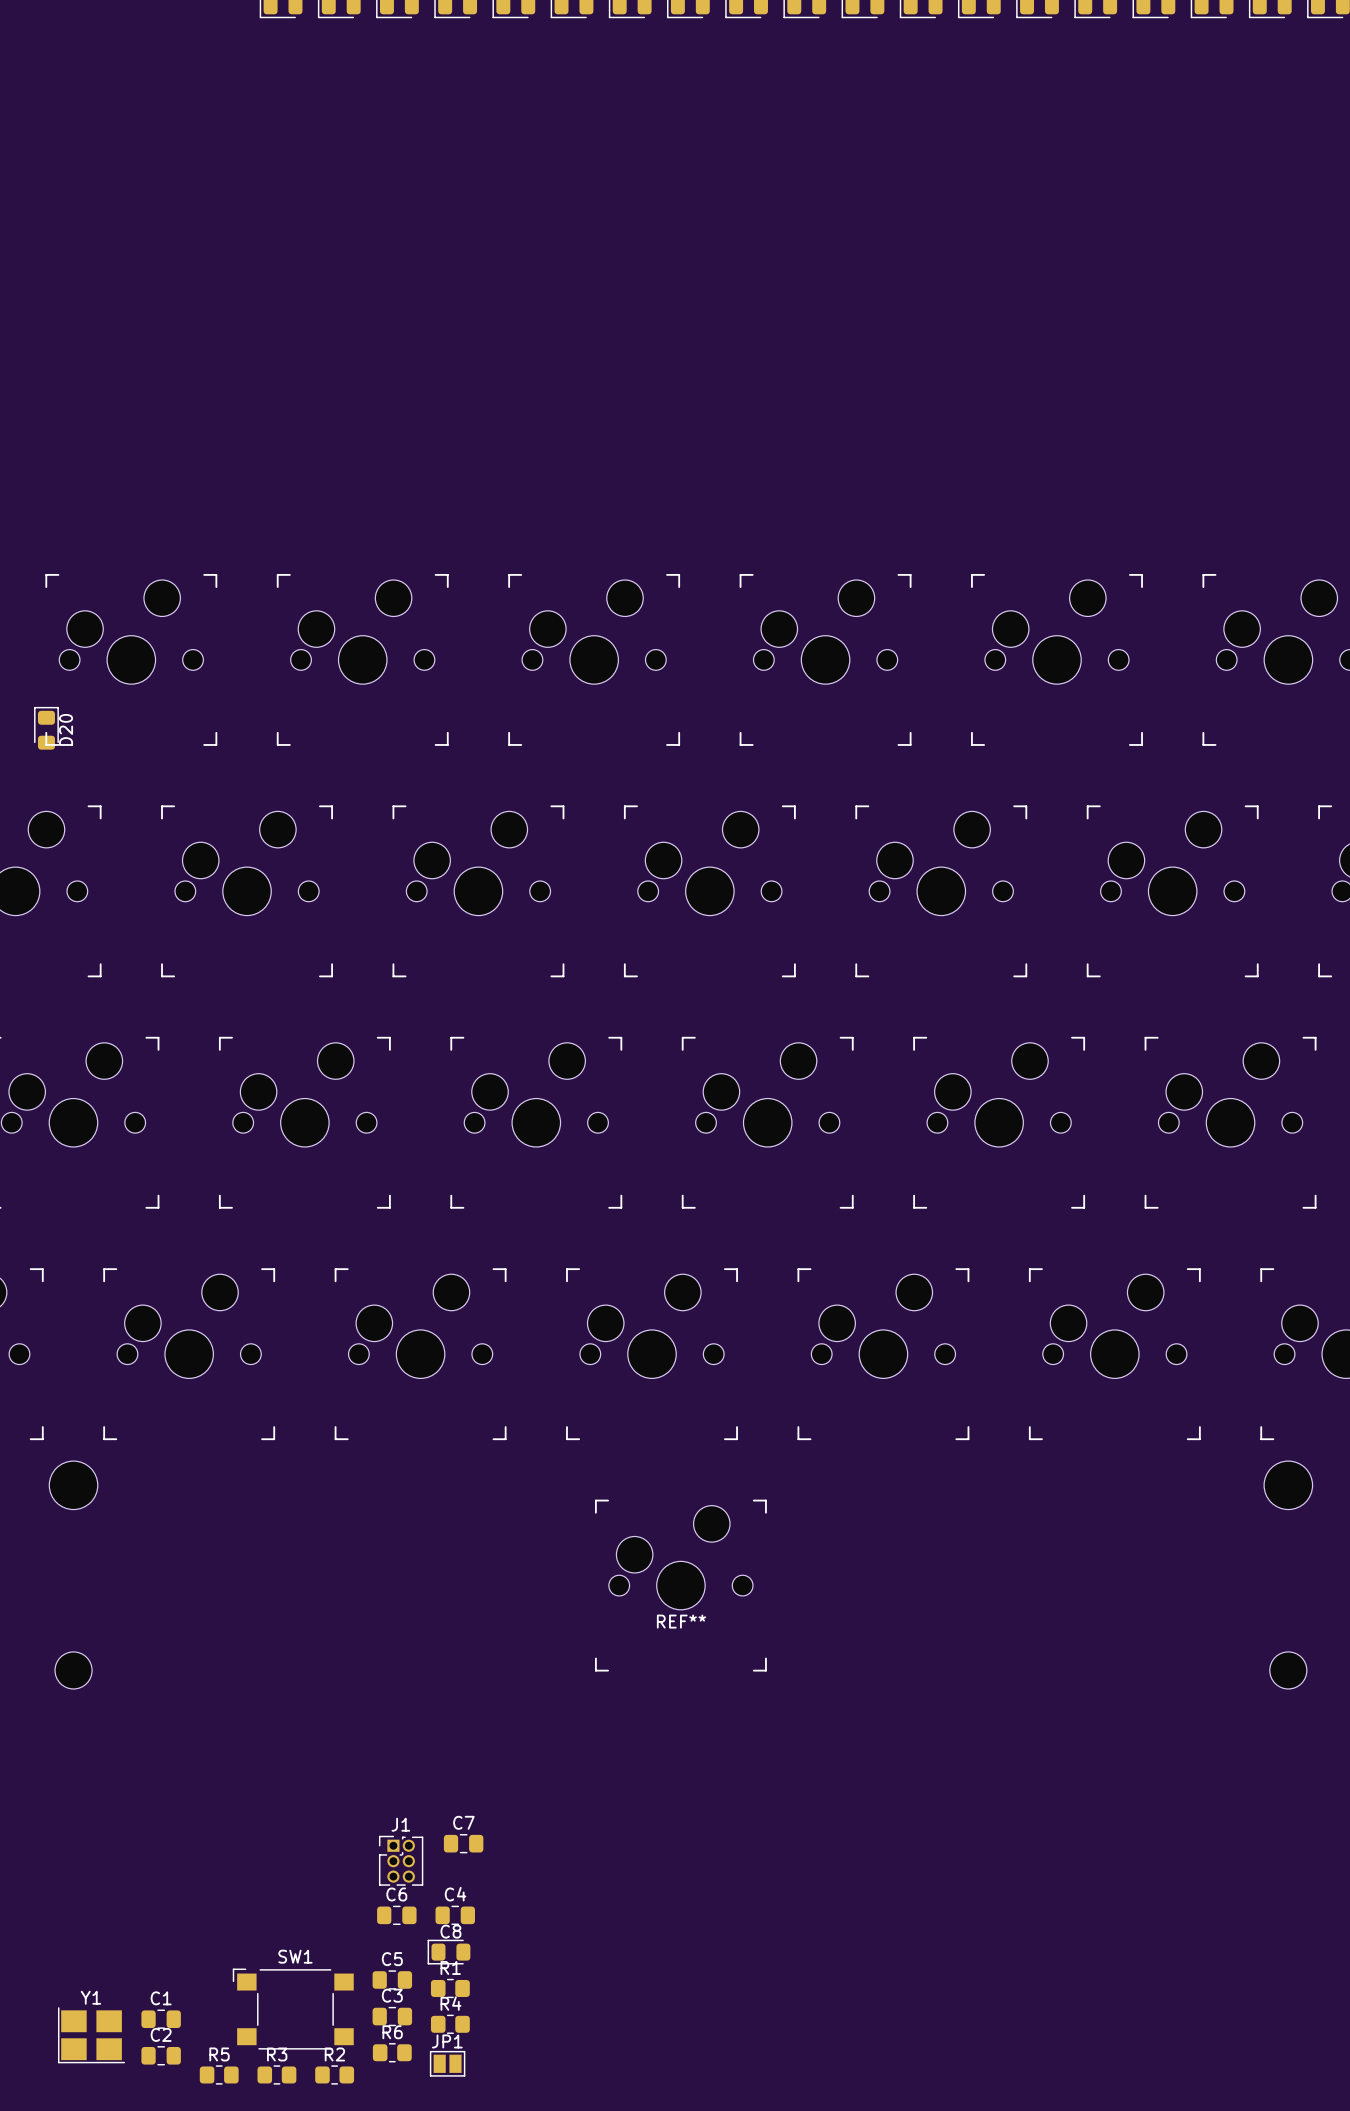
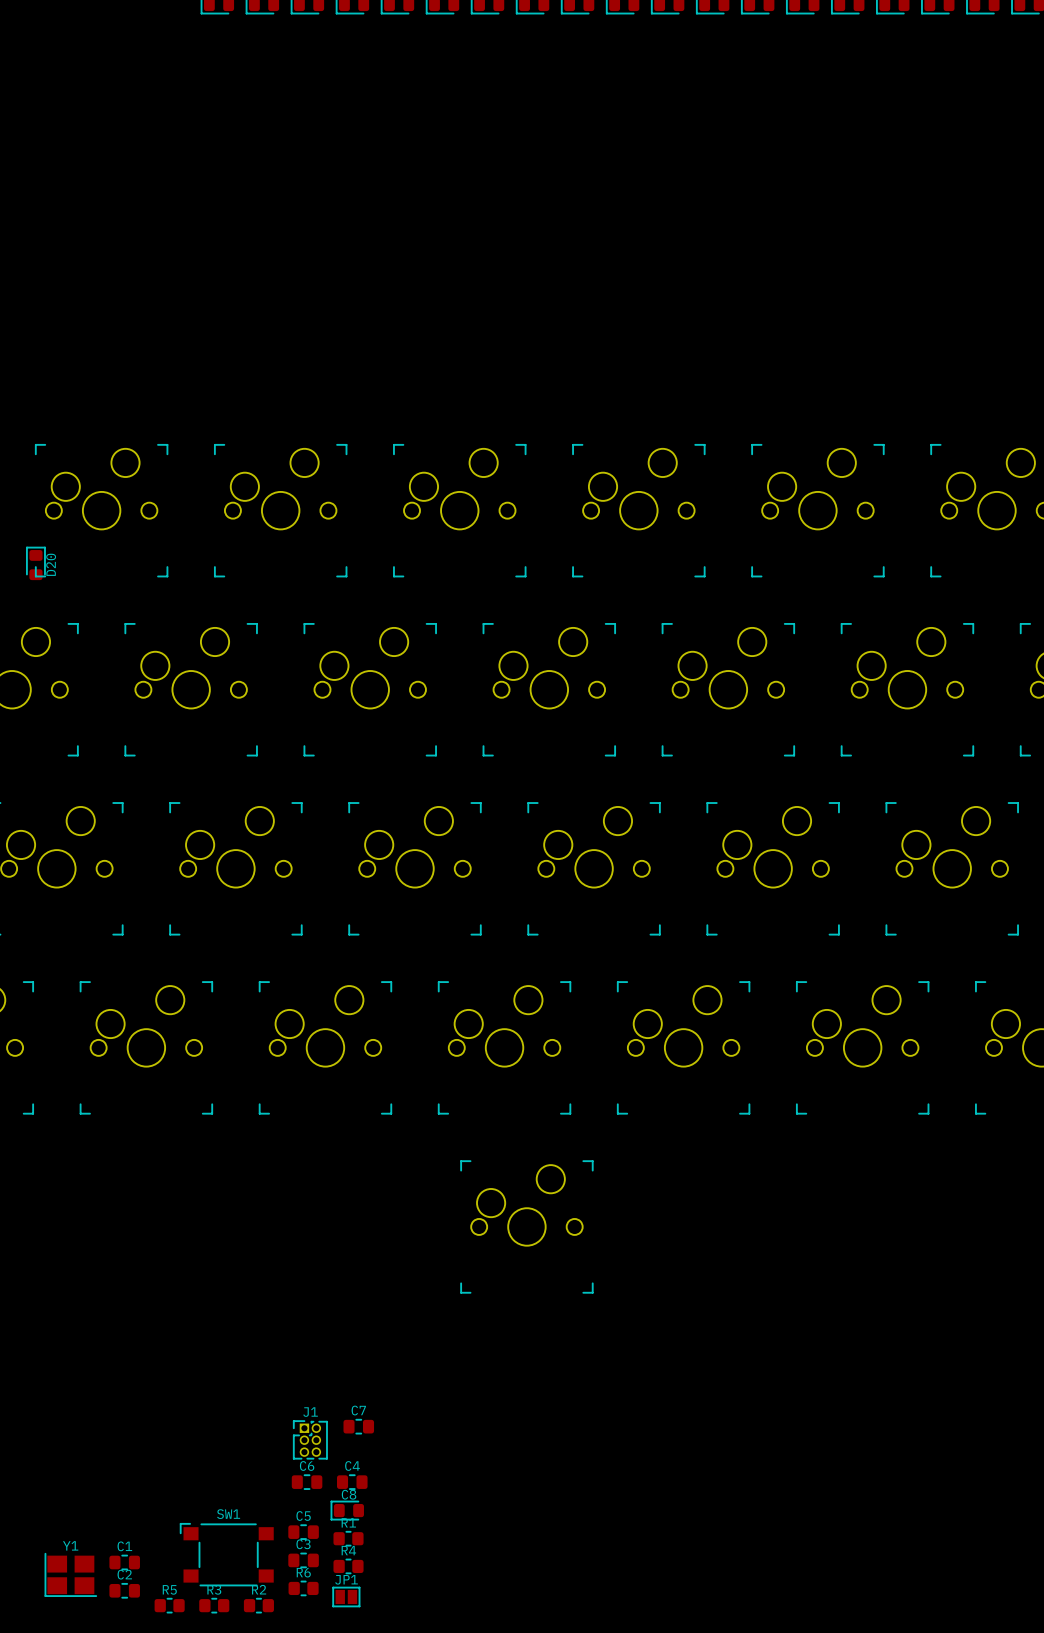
REF**: (680, 1575) -> none

